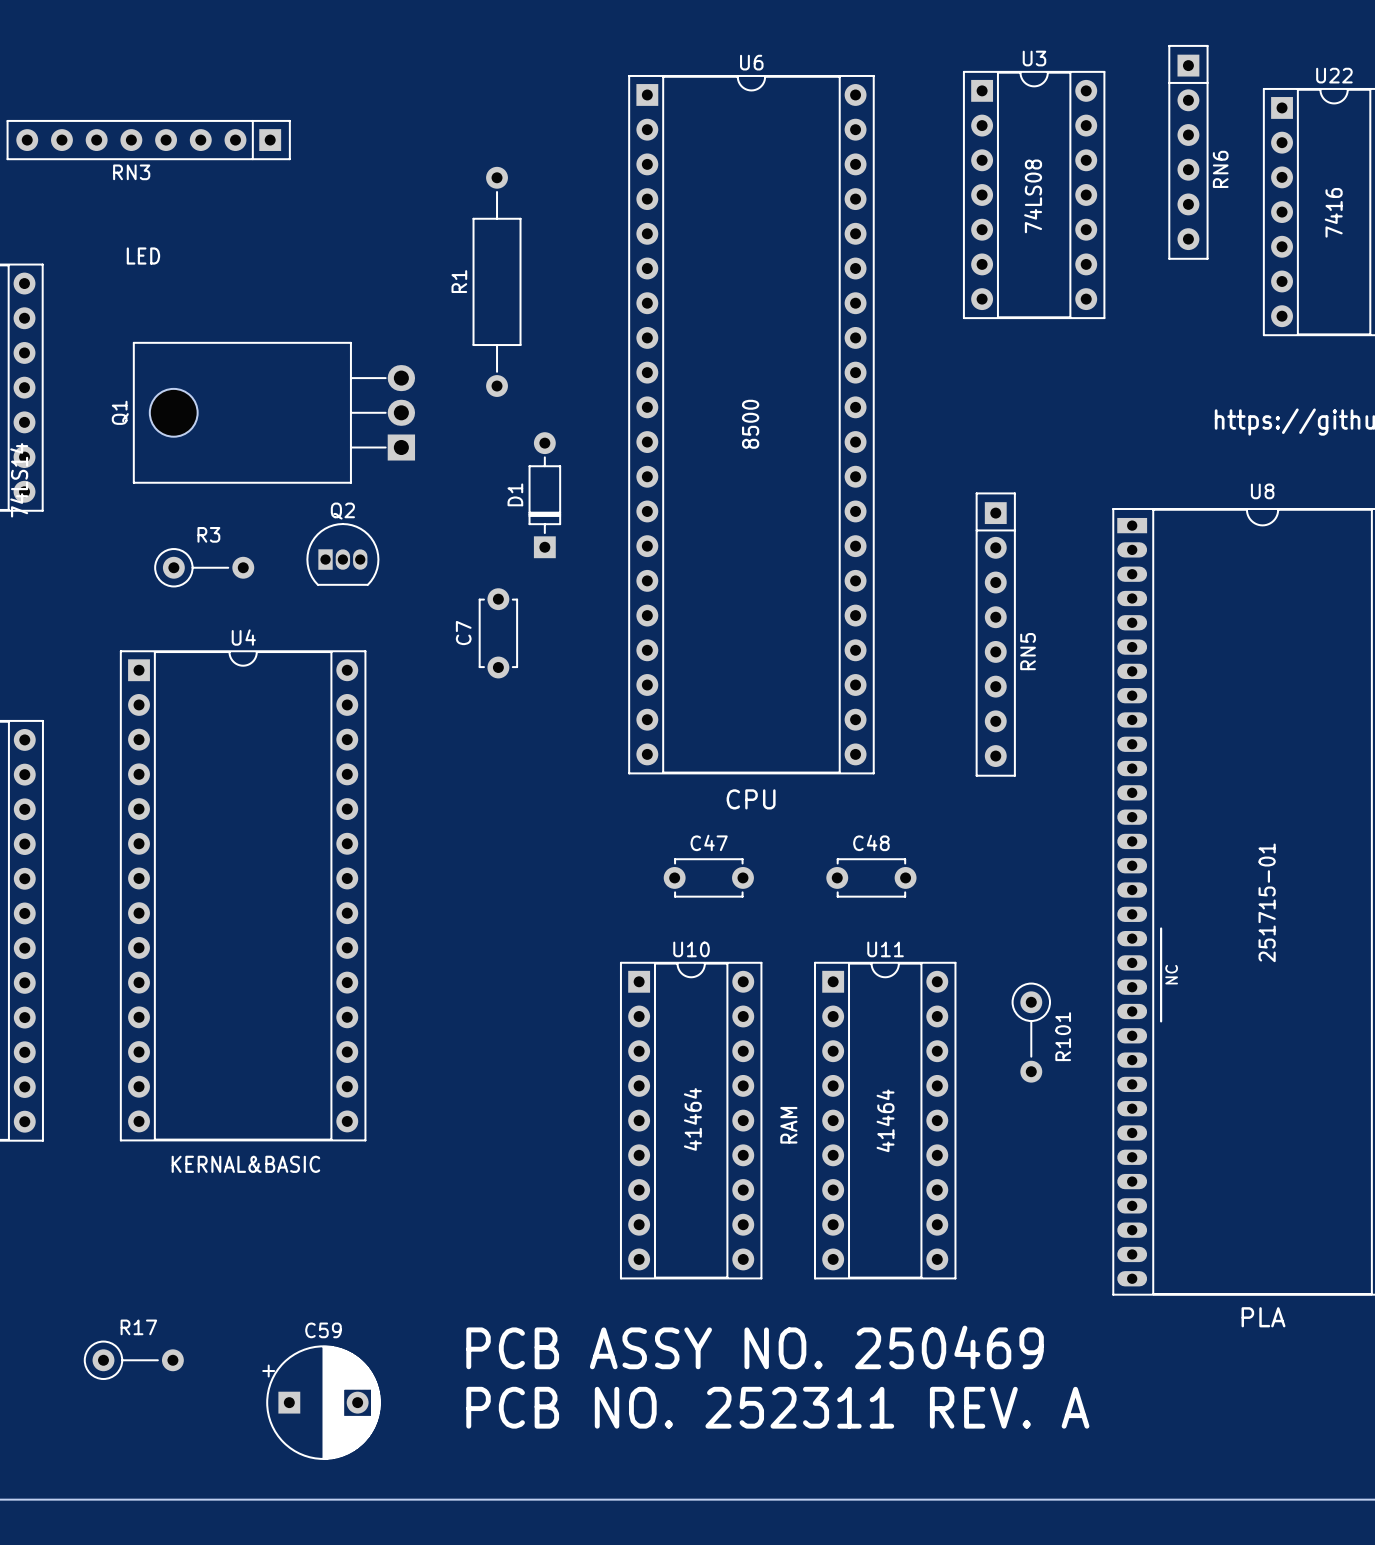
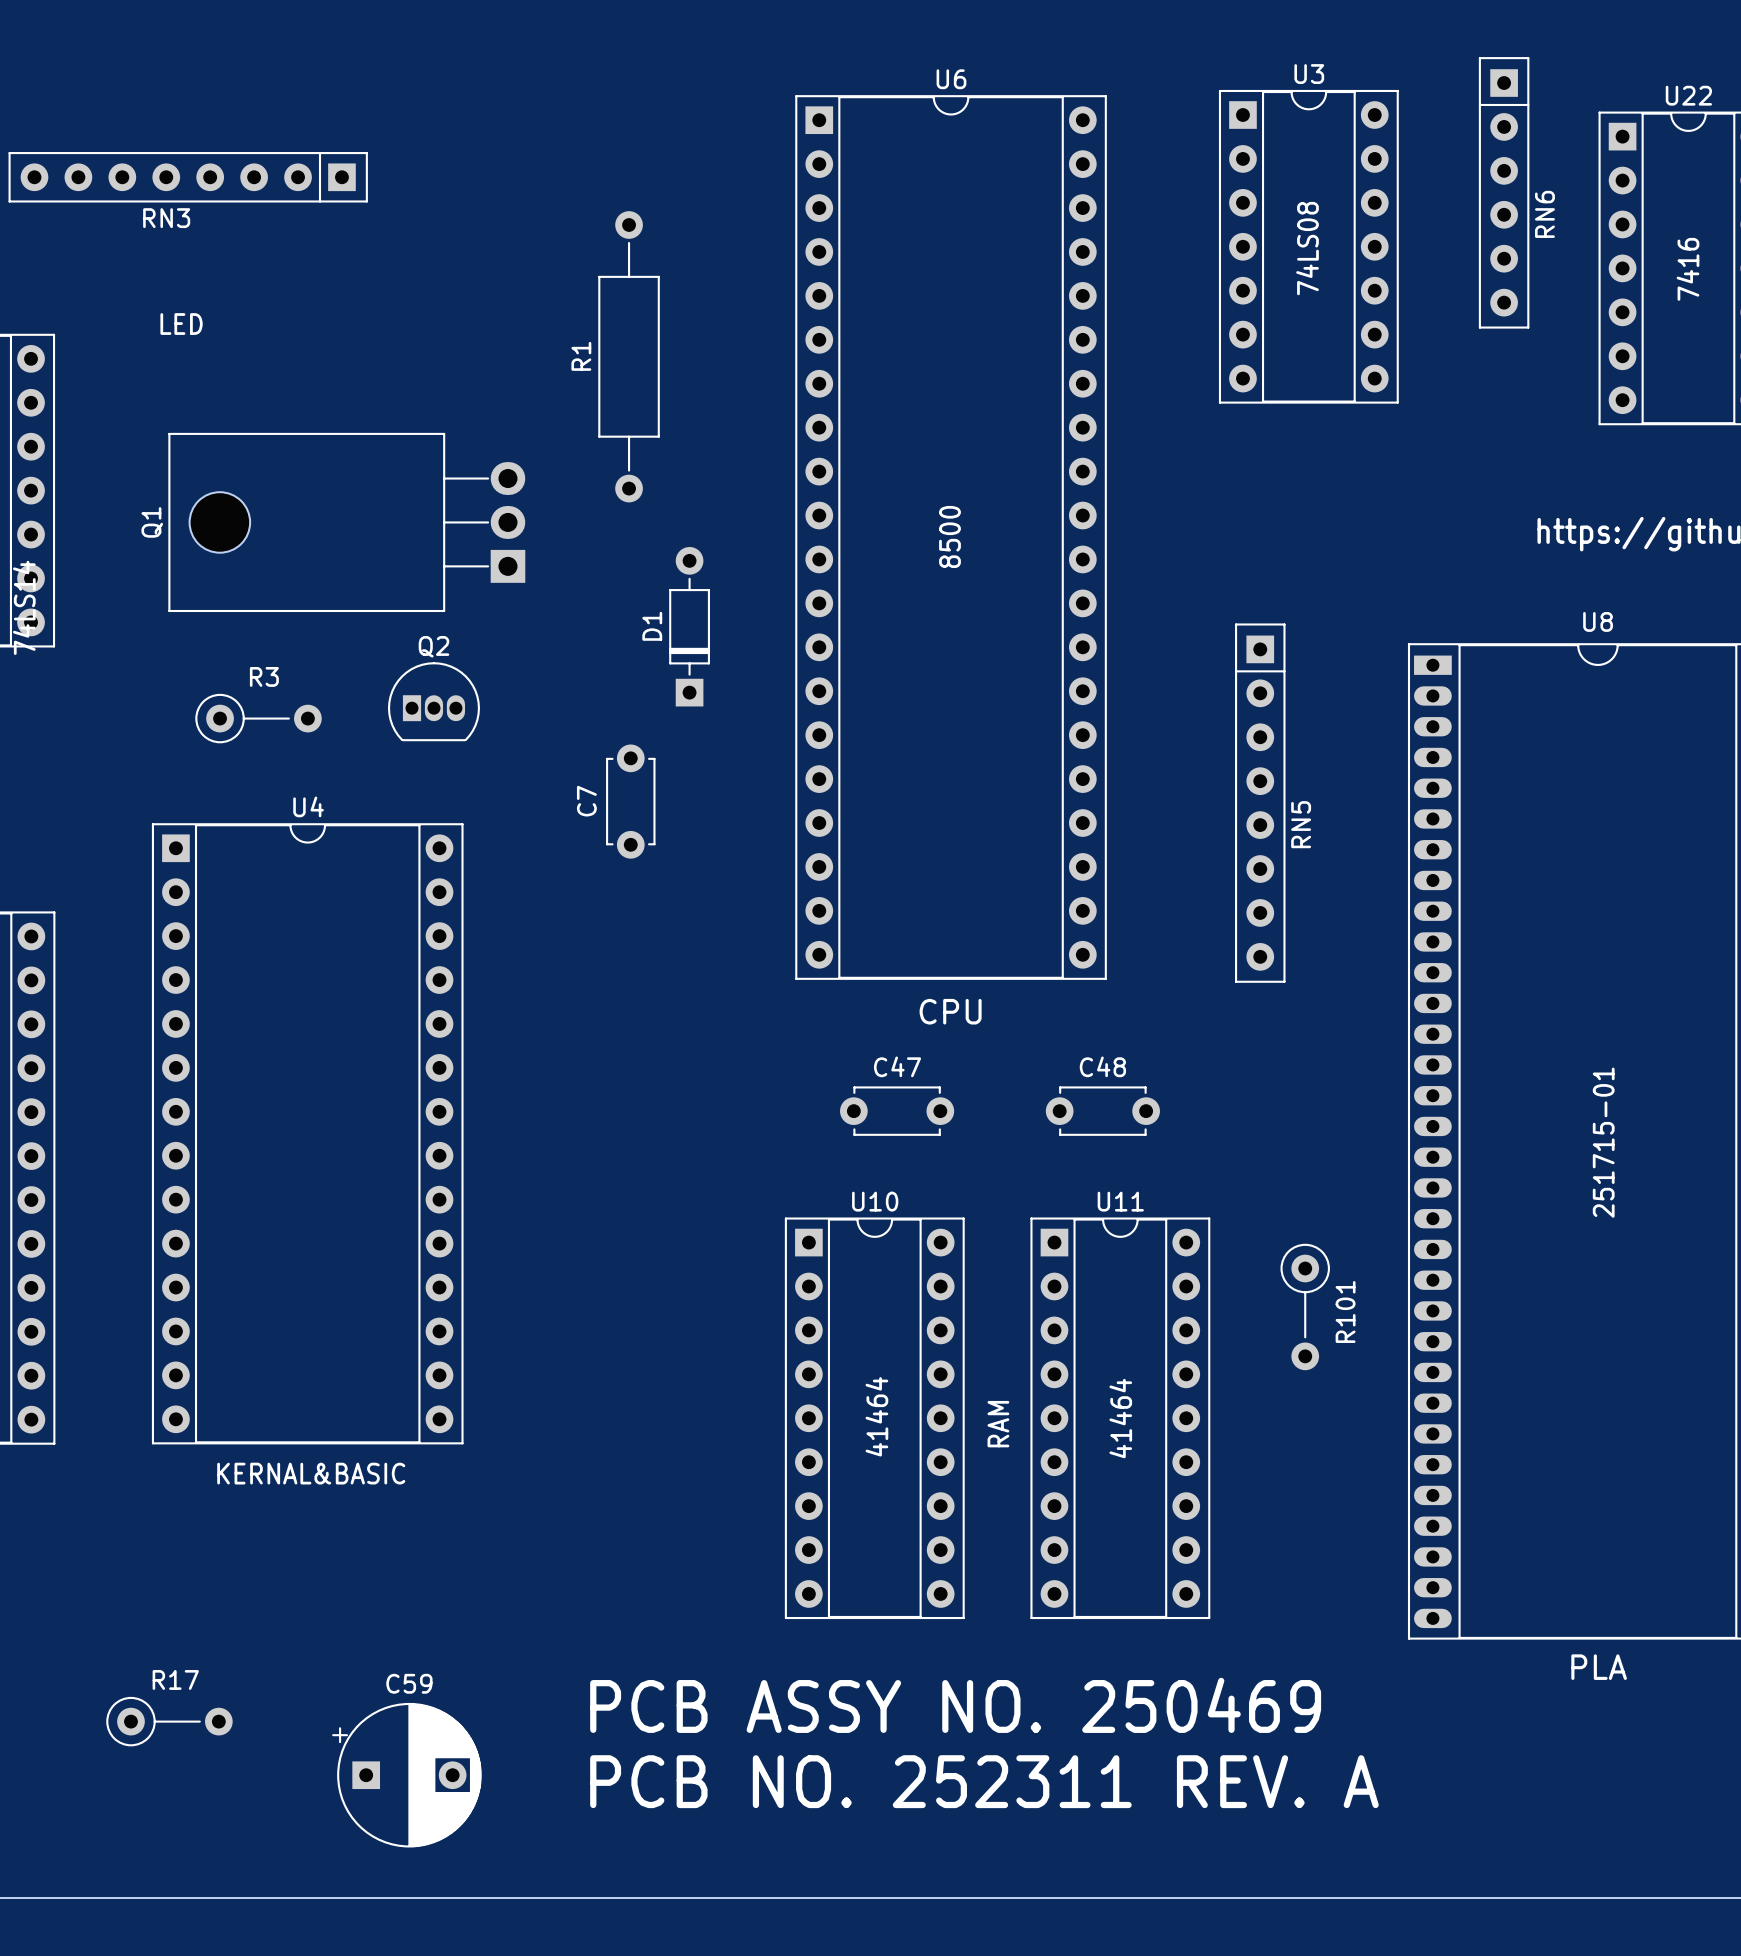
line: (1161, 928) (1161, 1021) -> none
text: NC (1171, 974) -> none

